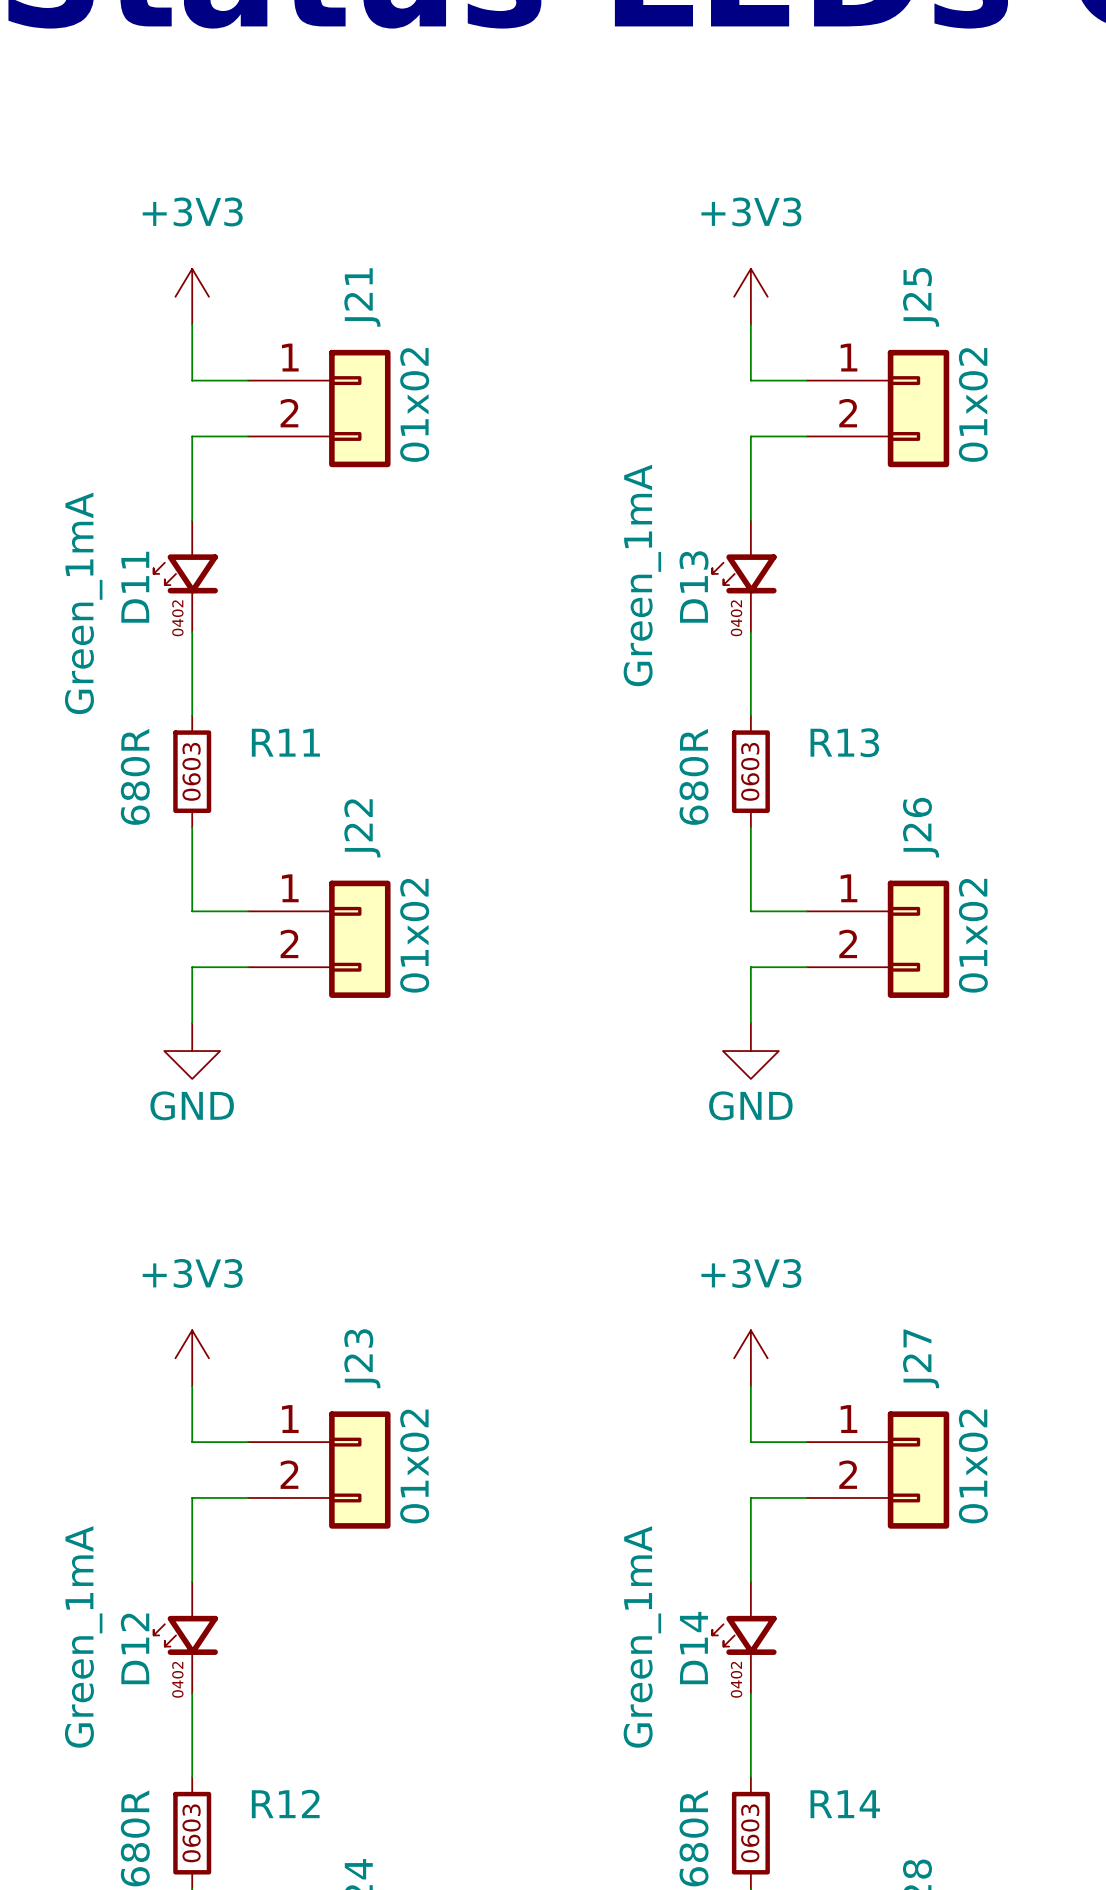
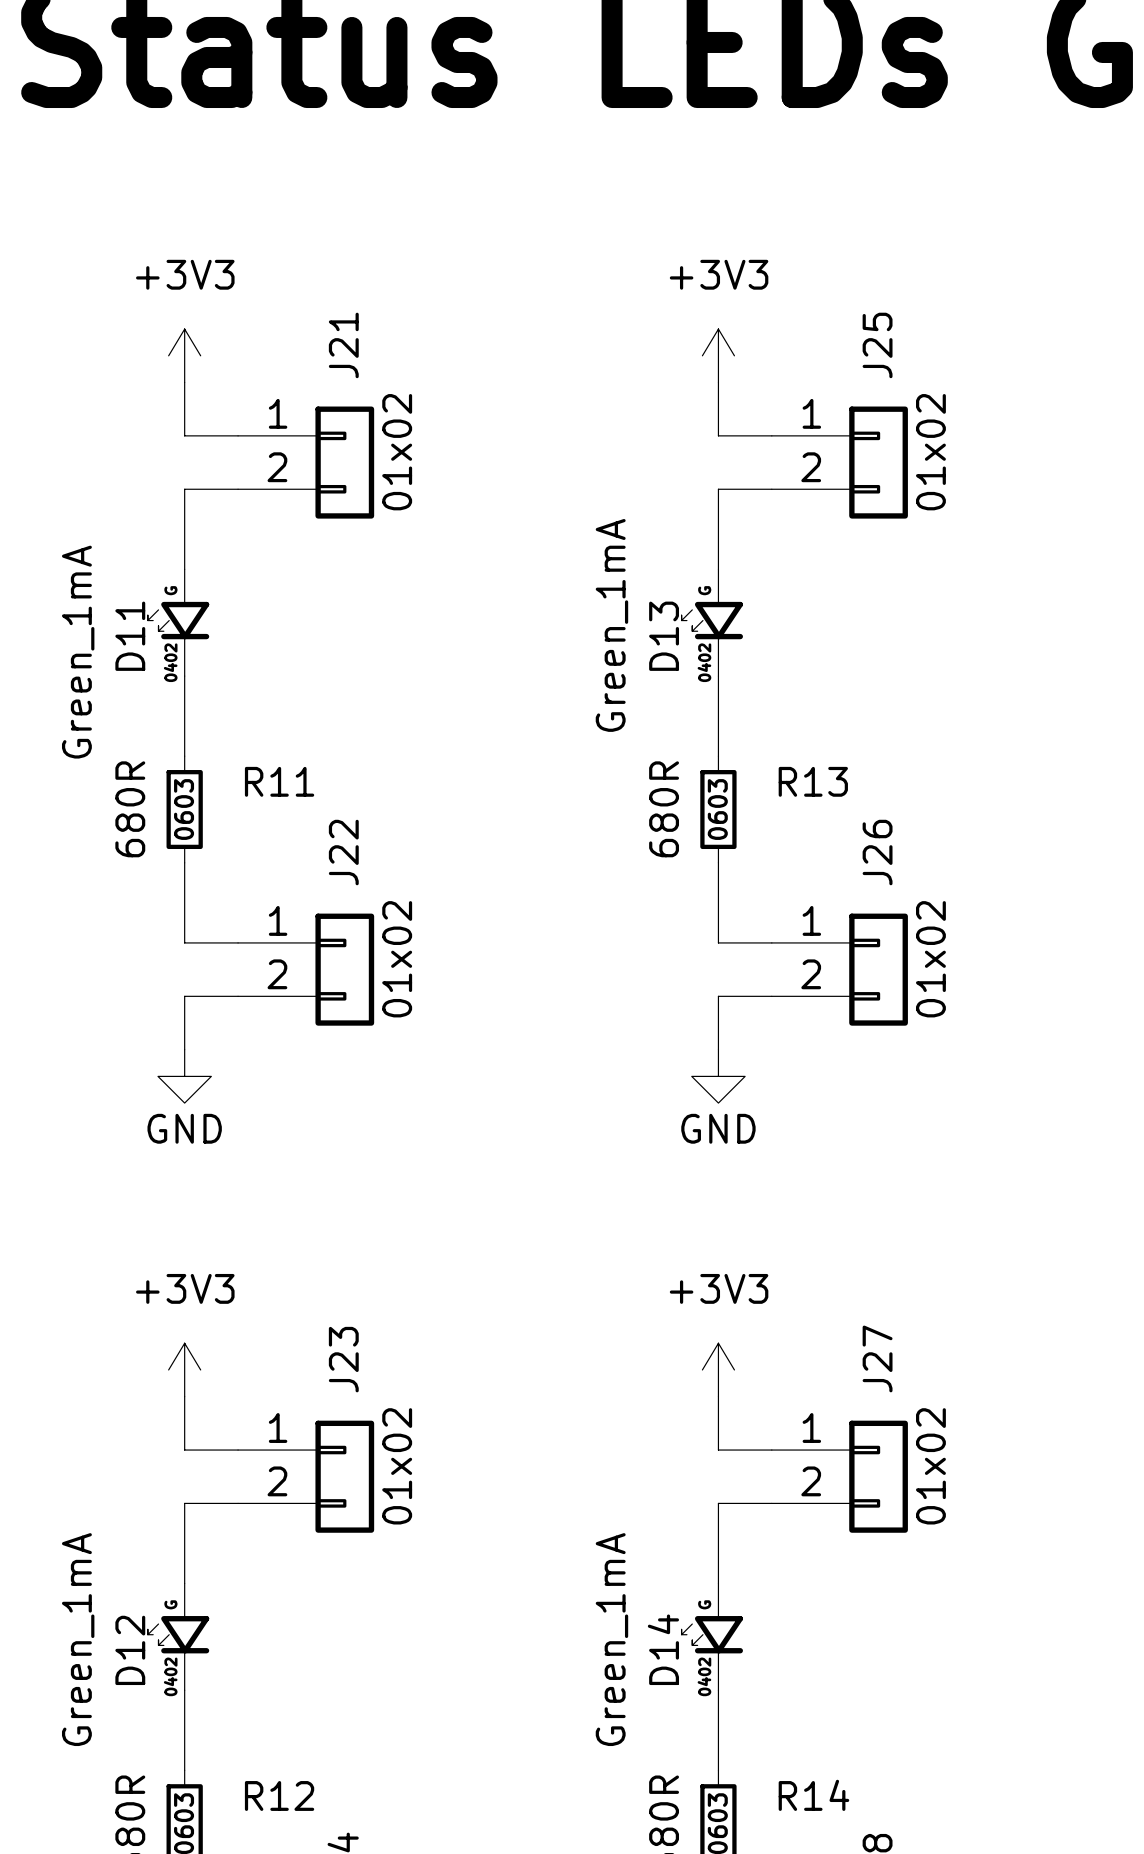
D11 text: none -> G (170, 590)
D13 text: none -> G (704, 590)
D12 text: none -> G (170, 1604)
D14 text: none -> G (704, 1604)

